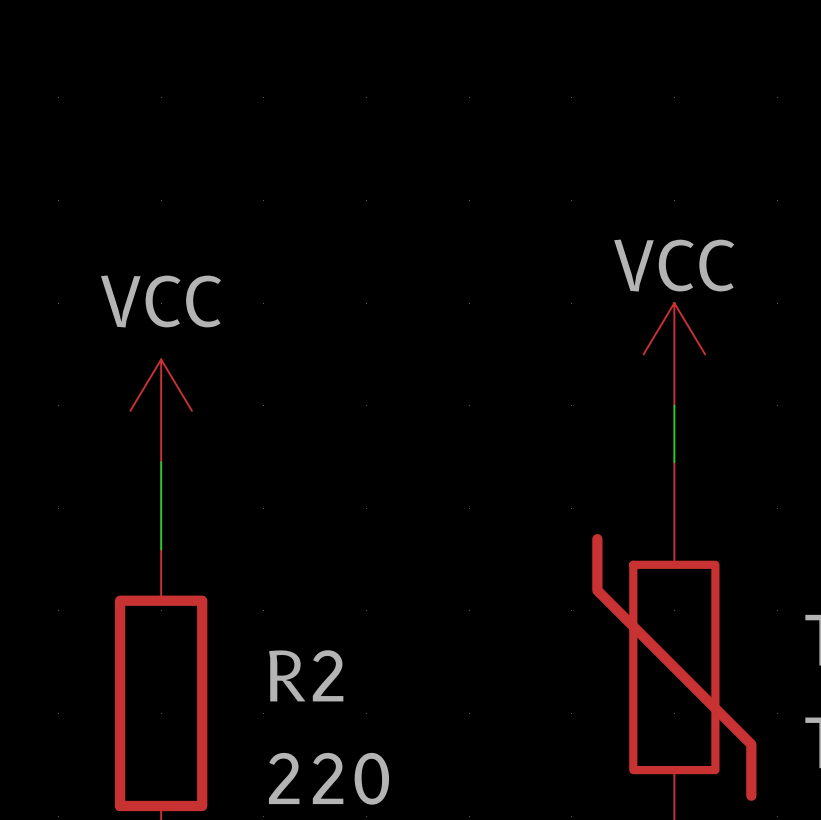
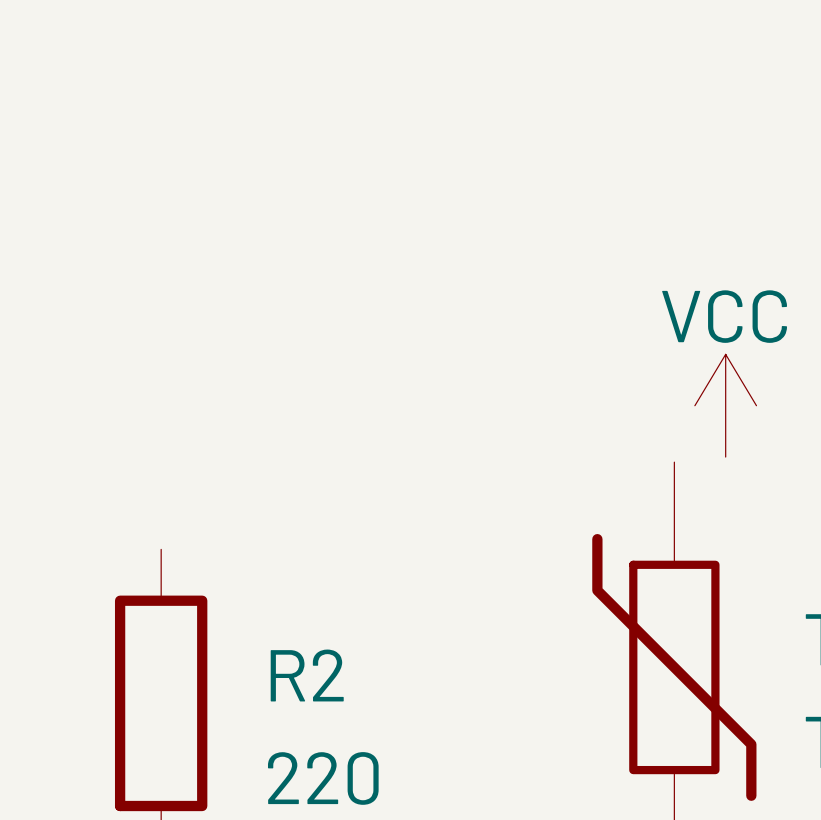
power symbol position: VCC (674, 354) -> VCC (725, 405)
wire: (674, 405) (674, 462) -> none
power symbol: VCC (161, 410) -> none
wire: (161, 462) (161, 549) -> none

